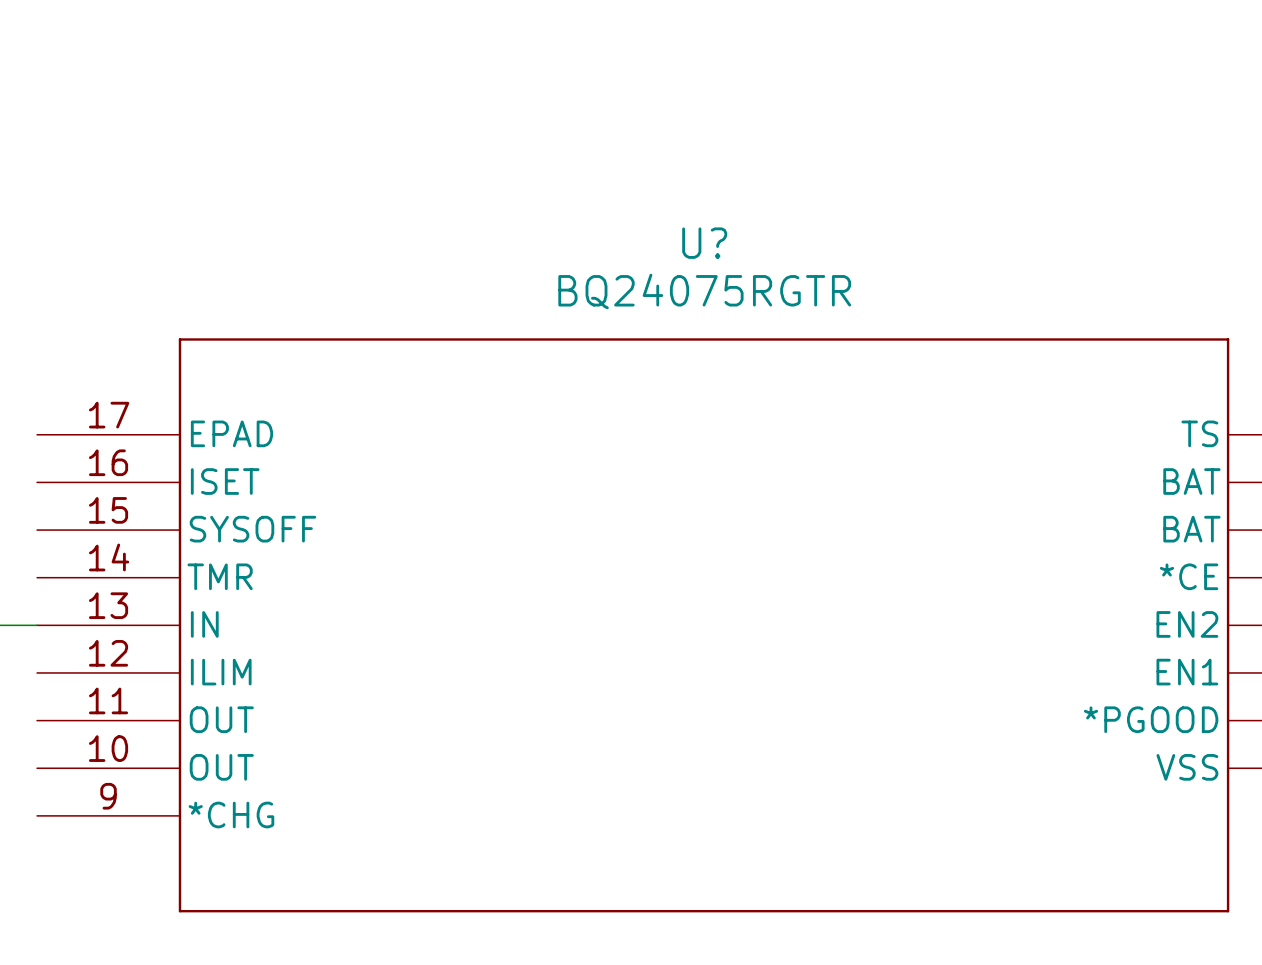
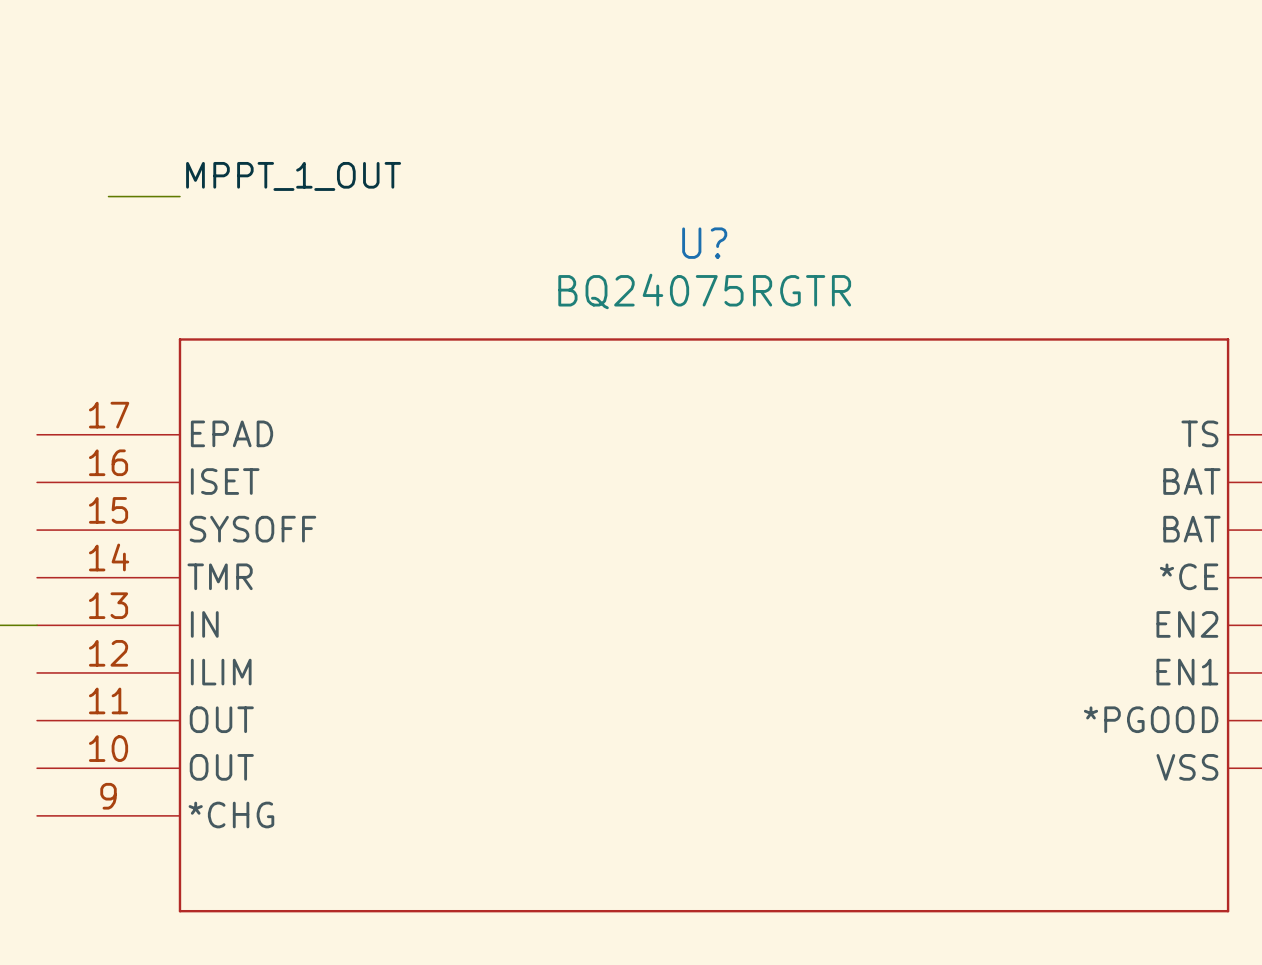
label: none -> MPPT_1_OUT (293, 176)
wire: none -> (108, 196) (179, 196)

